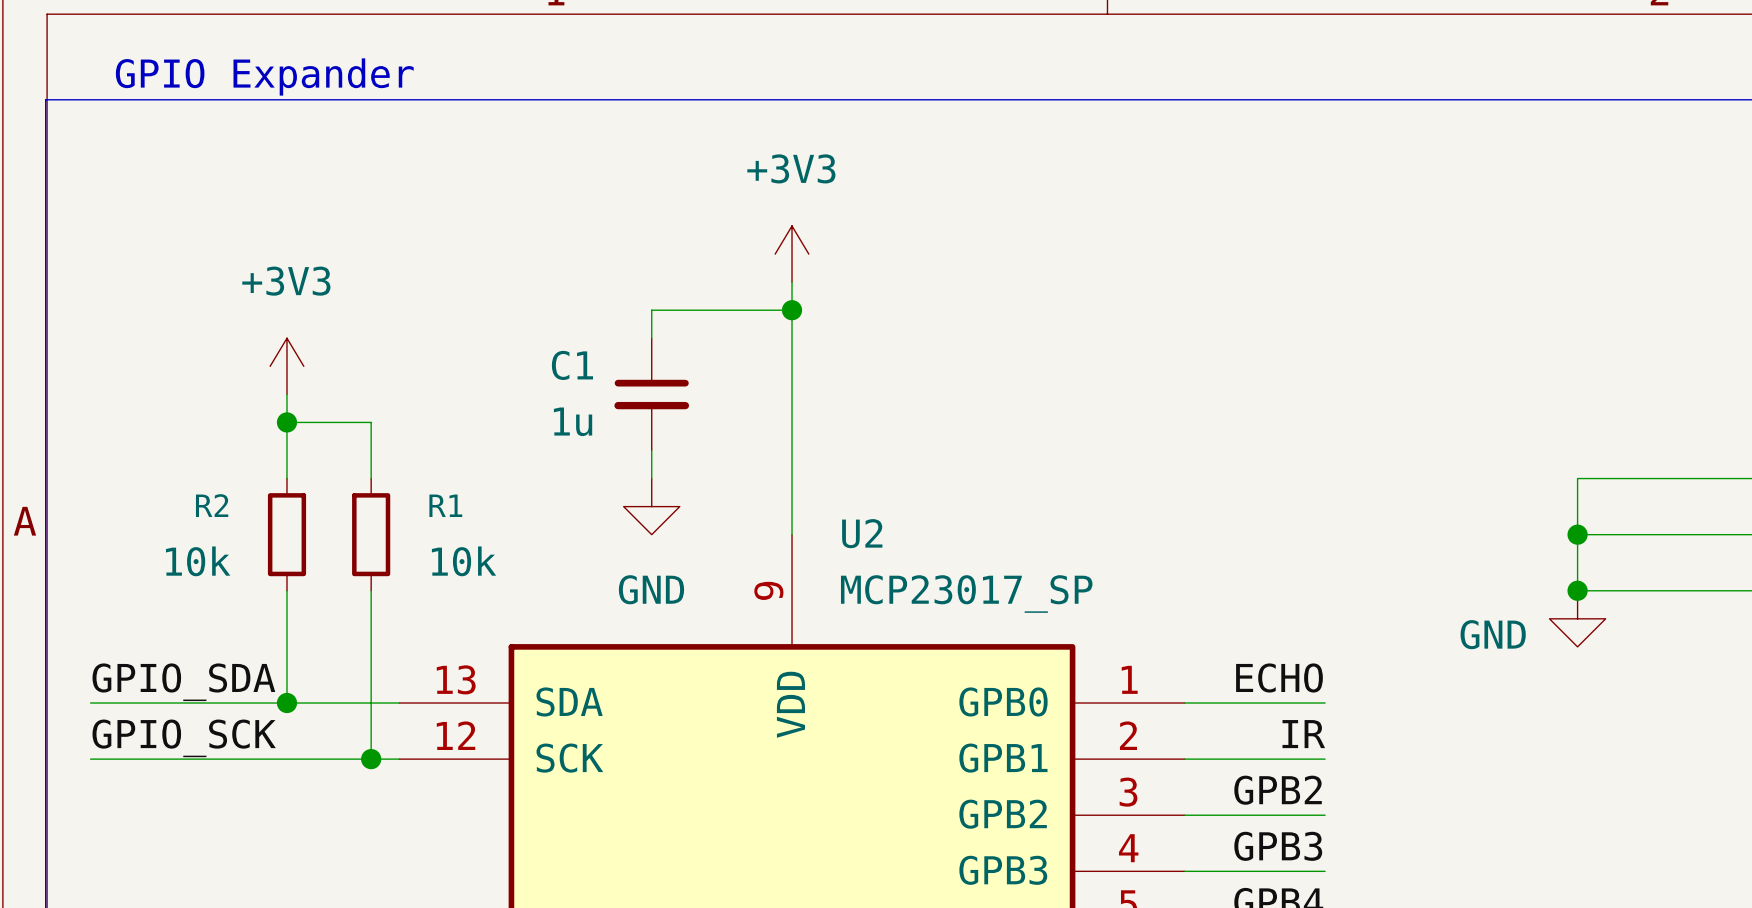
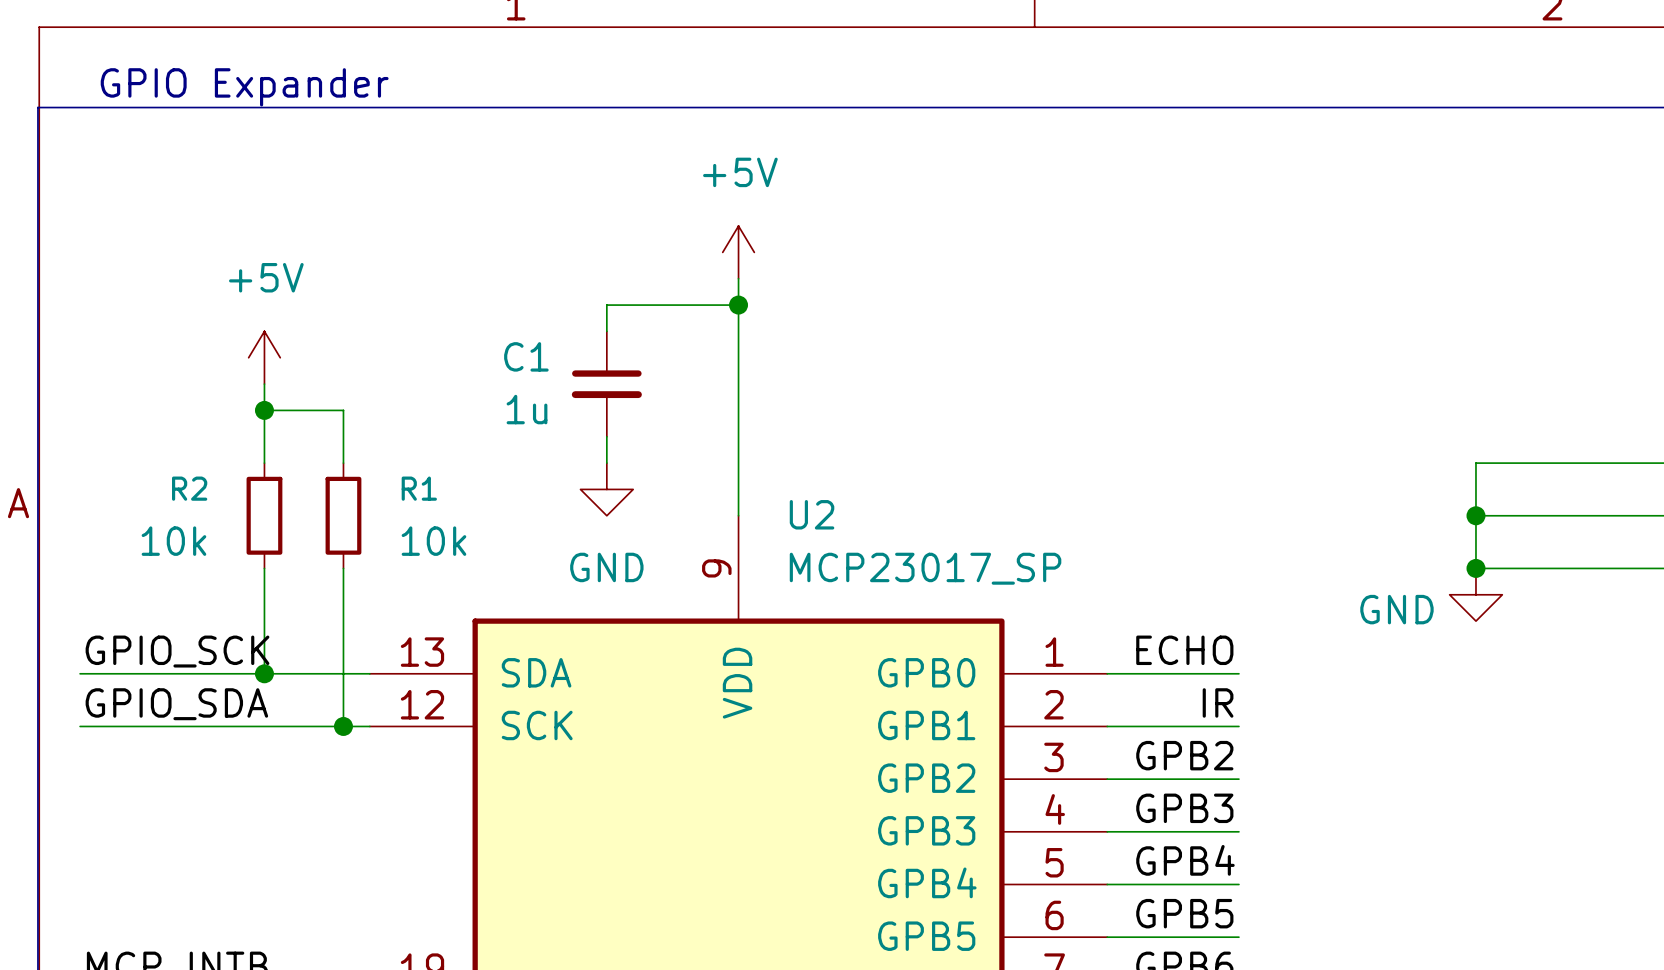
power symbol: +3V3 (792, 254) -> +5V (738, 252)
power symbol: +3V3 (286, 366) -> +5V (264, 357)
label: GPIO_SDA (183, 682) -> GPIO_SCK (177, 651)
label: GPIO_SCK (184, 738) -> GPIO_SDA (176, 704)

